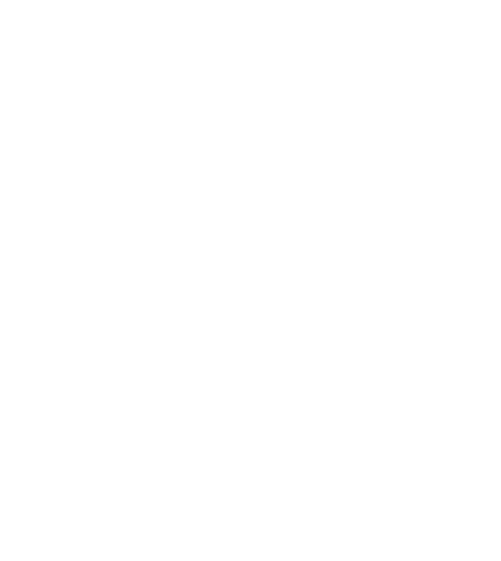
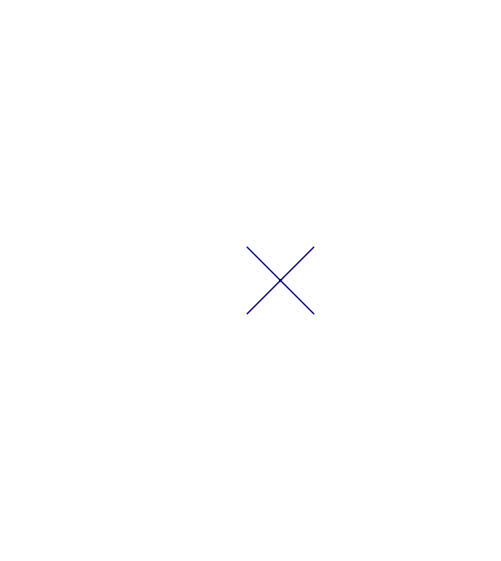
no-connect mark: none -> (280, 280)

